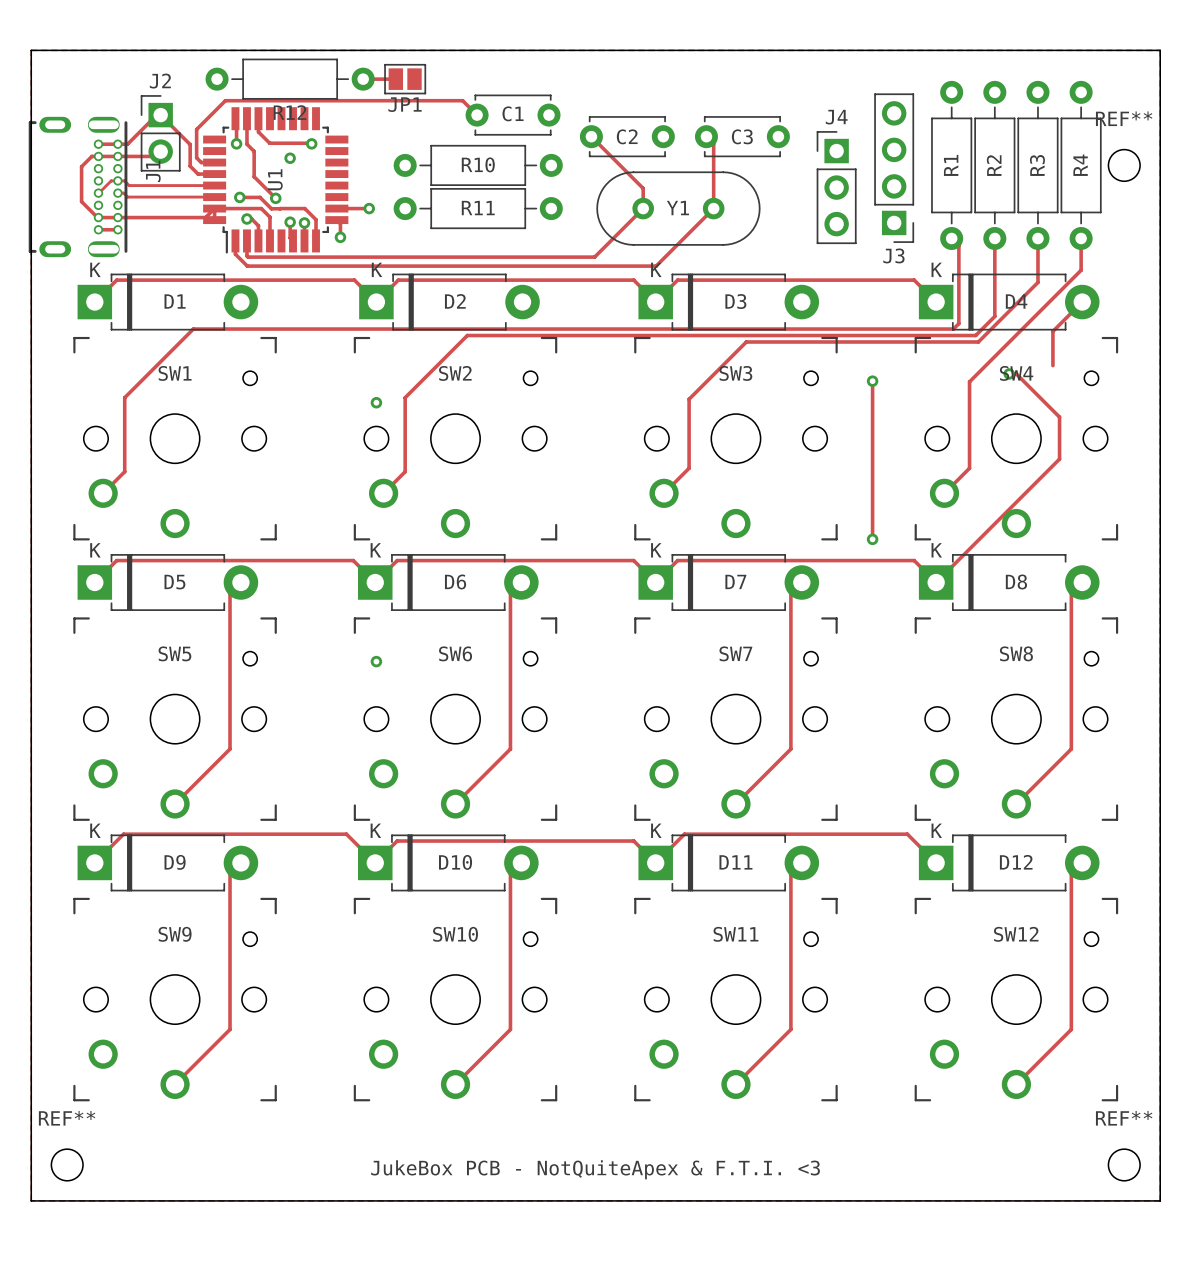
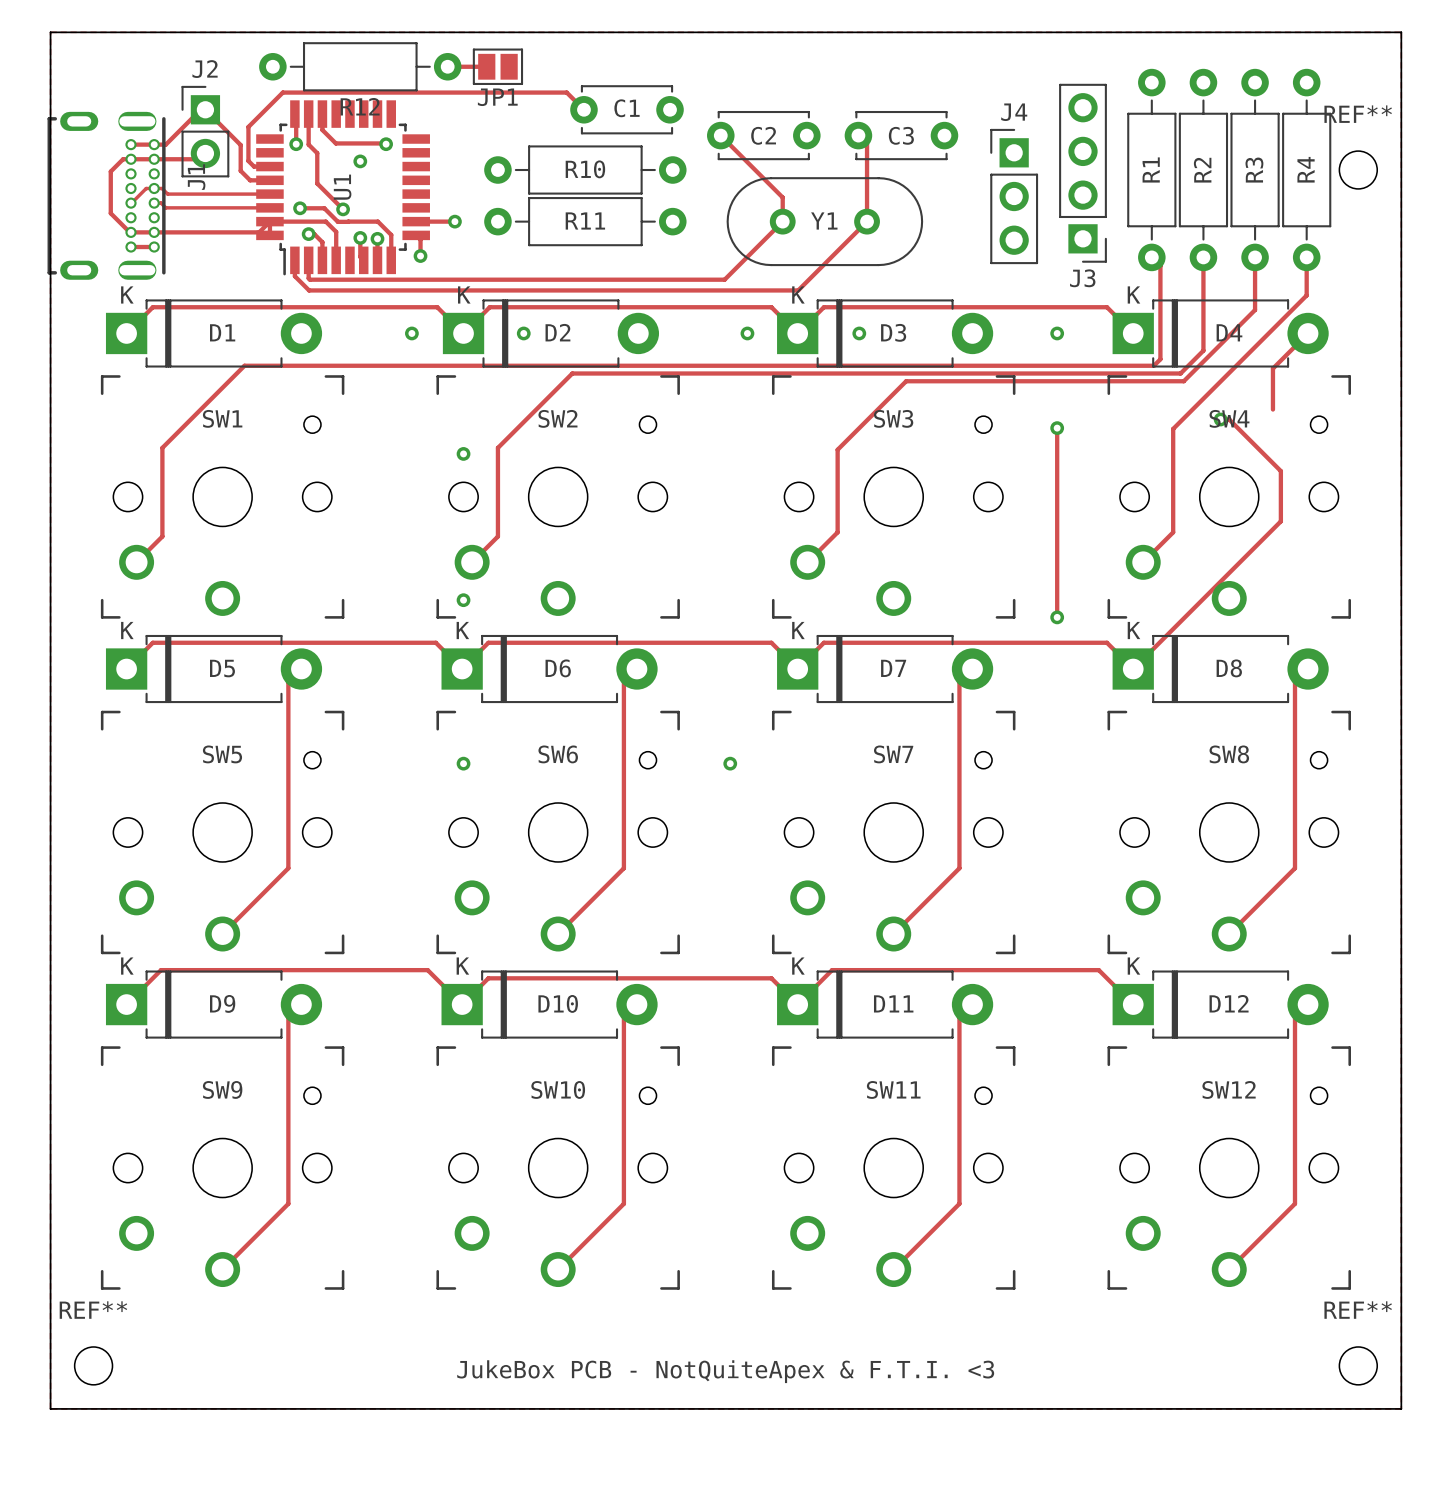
via: none -> (411, 333)
via: none -> (523, 333)
via: none -> (747, 333)
via: none -> (859, 333)
via: none -> (1057, 333)
via: none -> (463, 600)
via: none -> (730, 763)

